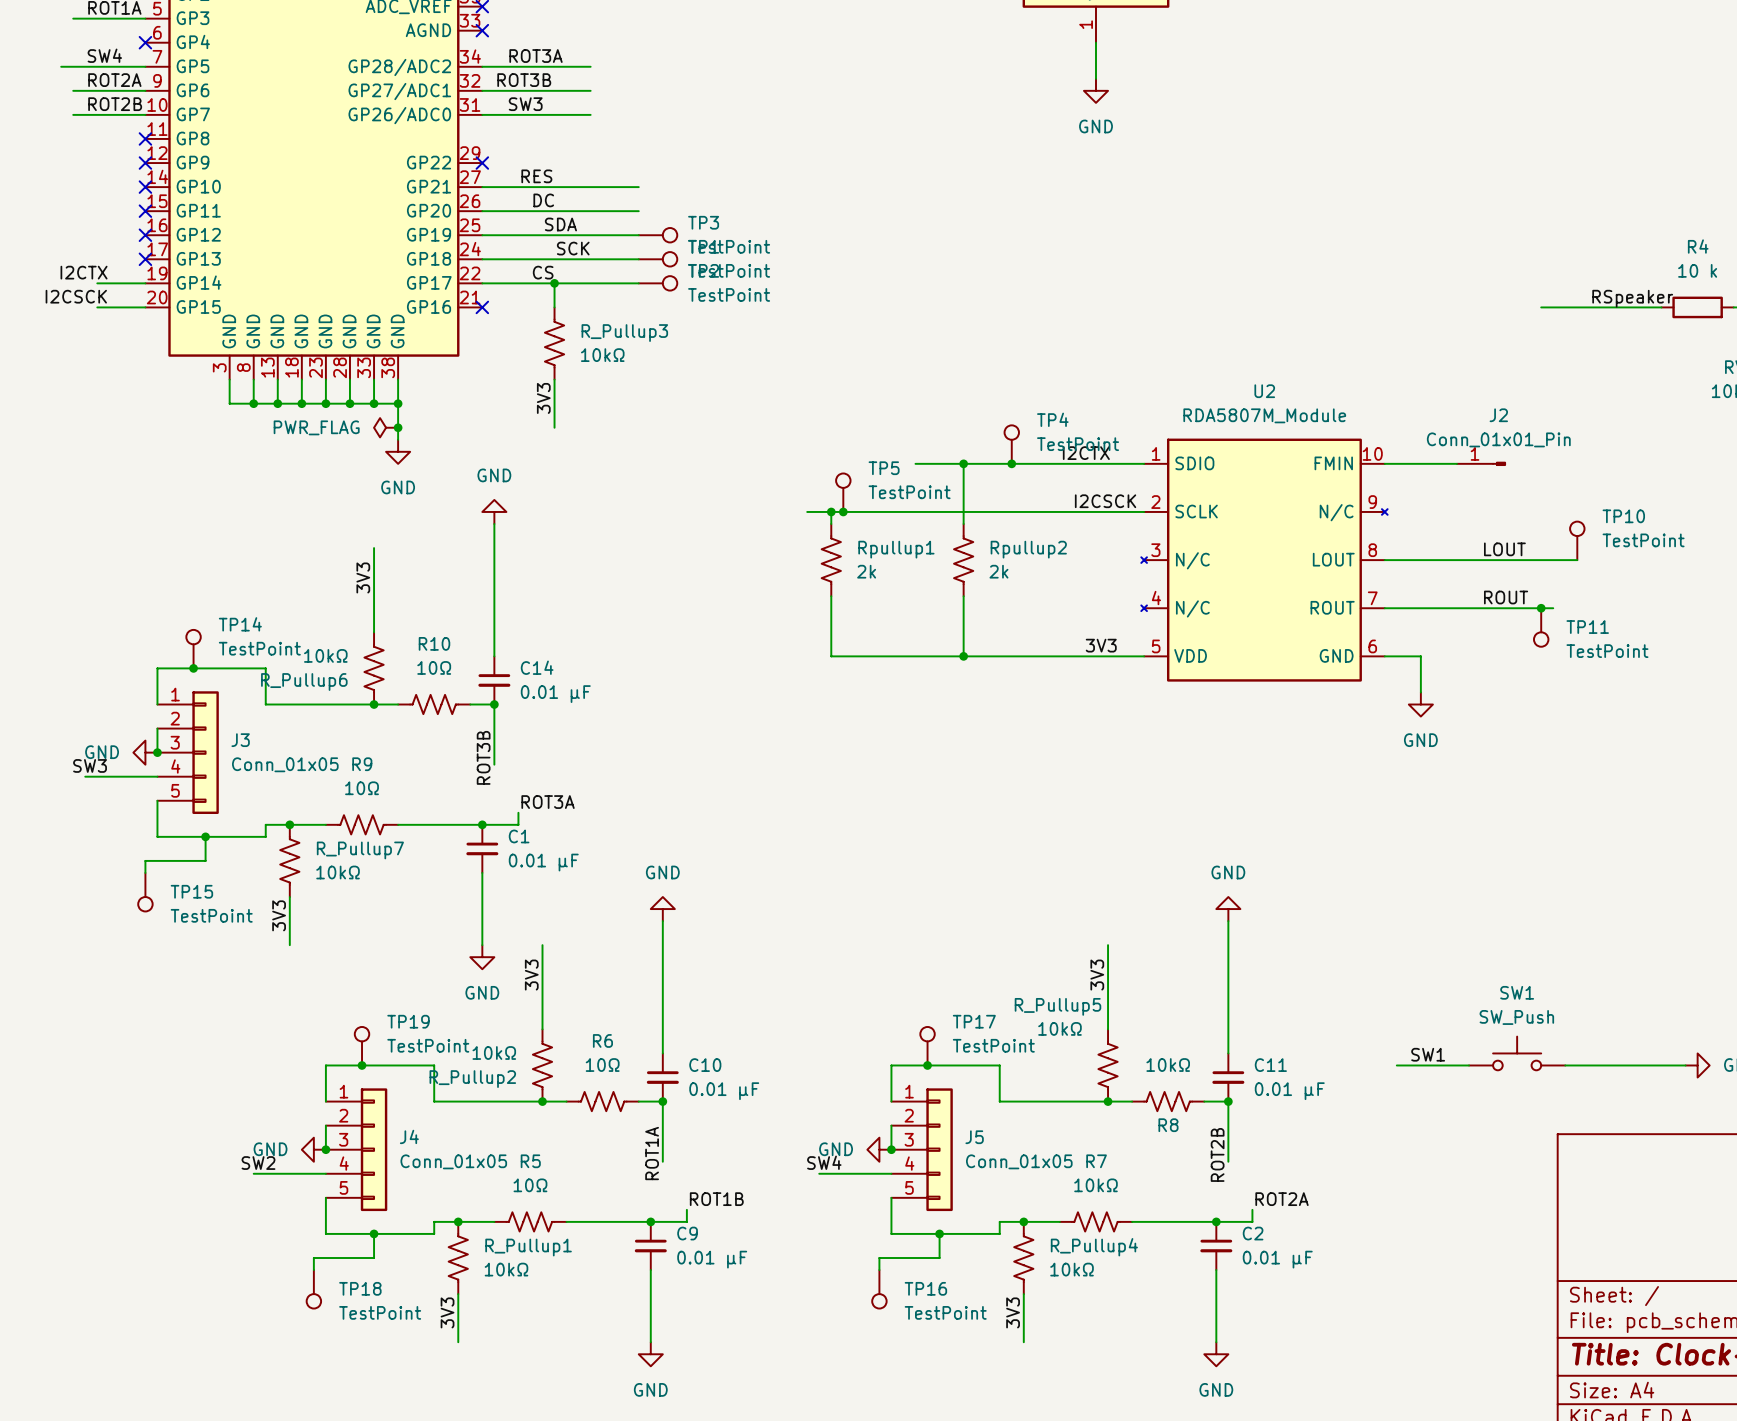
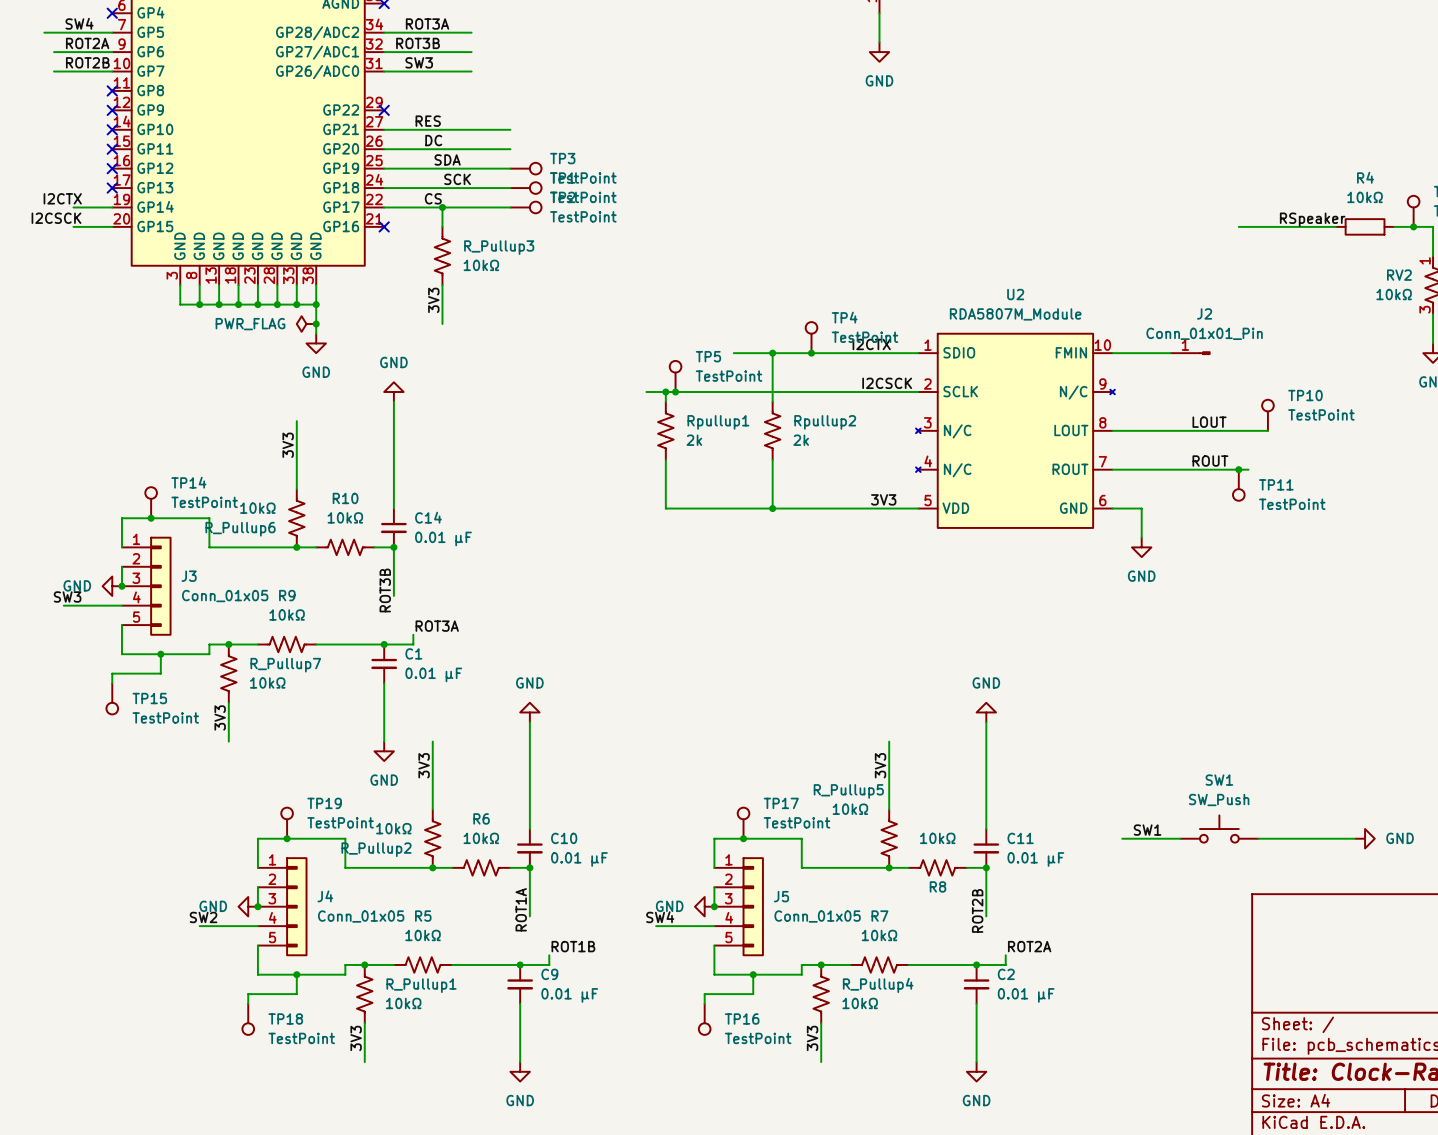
R4 value: 10 k (1697, 270) -> 10kΩ (1365, 197)
R10 value: 10Ω (434, 667) -> 10kΩ (345, 517)
R9 value: 10Ω (362, 788) -> 10kΩ (287, 615)
R6 value: 10Ω (602, 1065) -> 10kΩ (481, 838)
R5 value: 10Ω (530, 1185) -> 10kΩ (423, 935)

